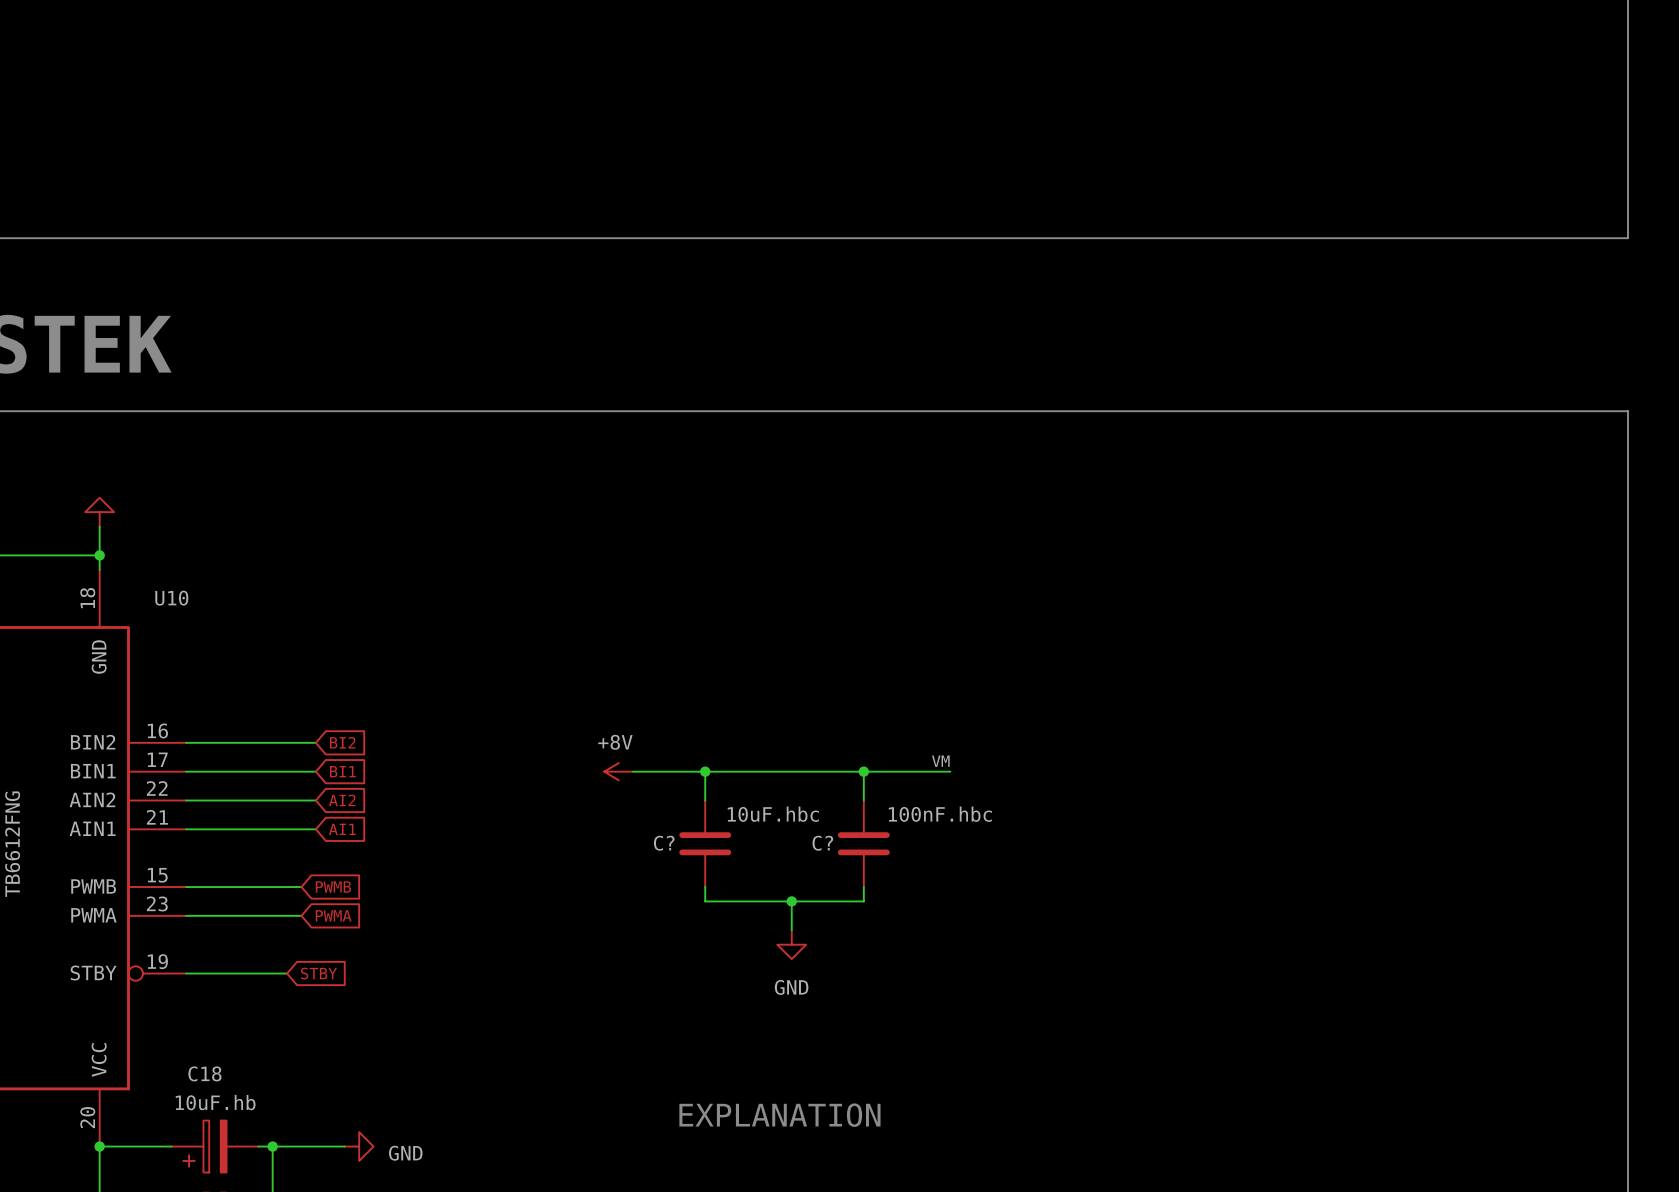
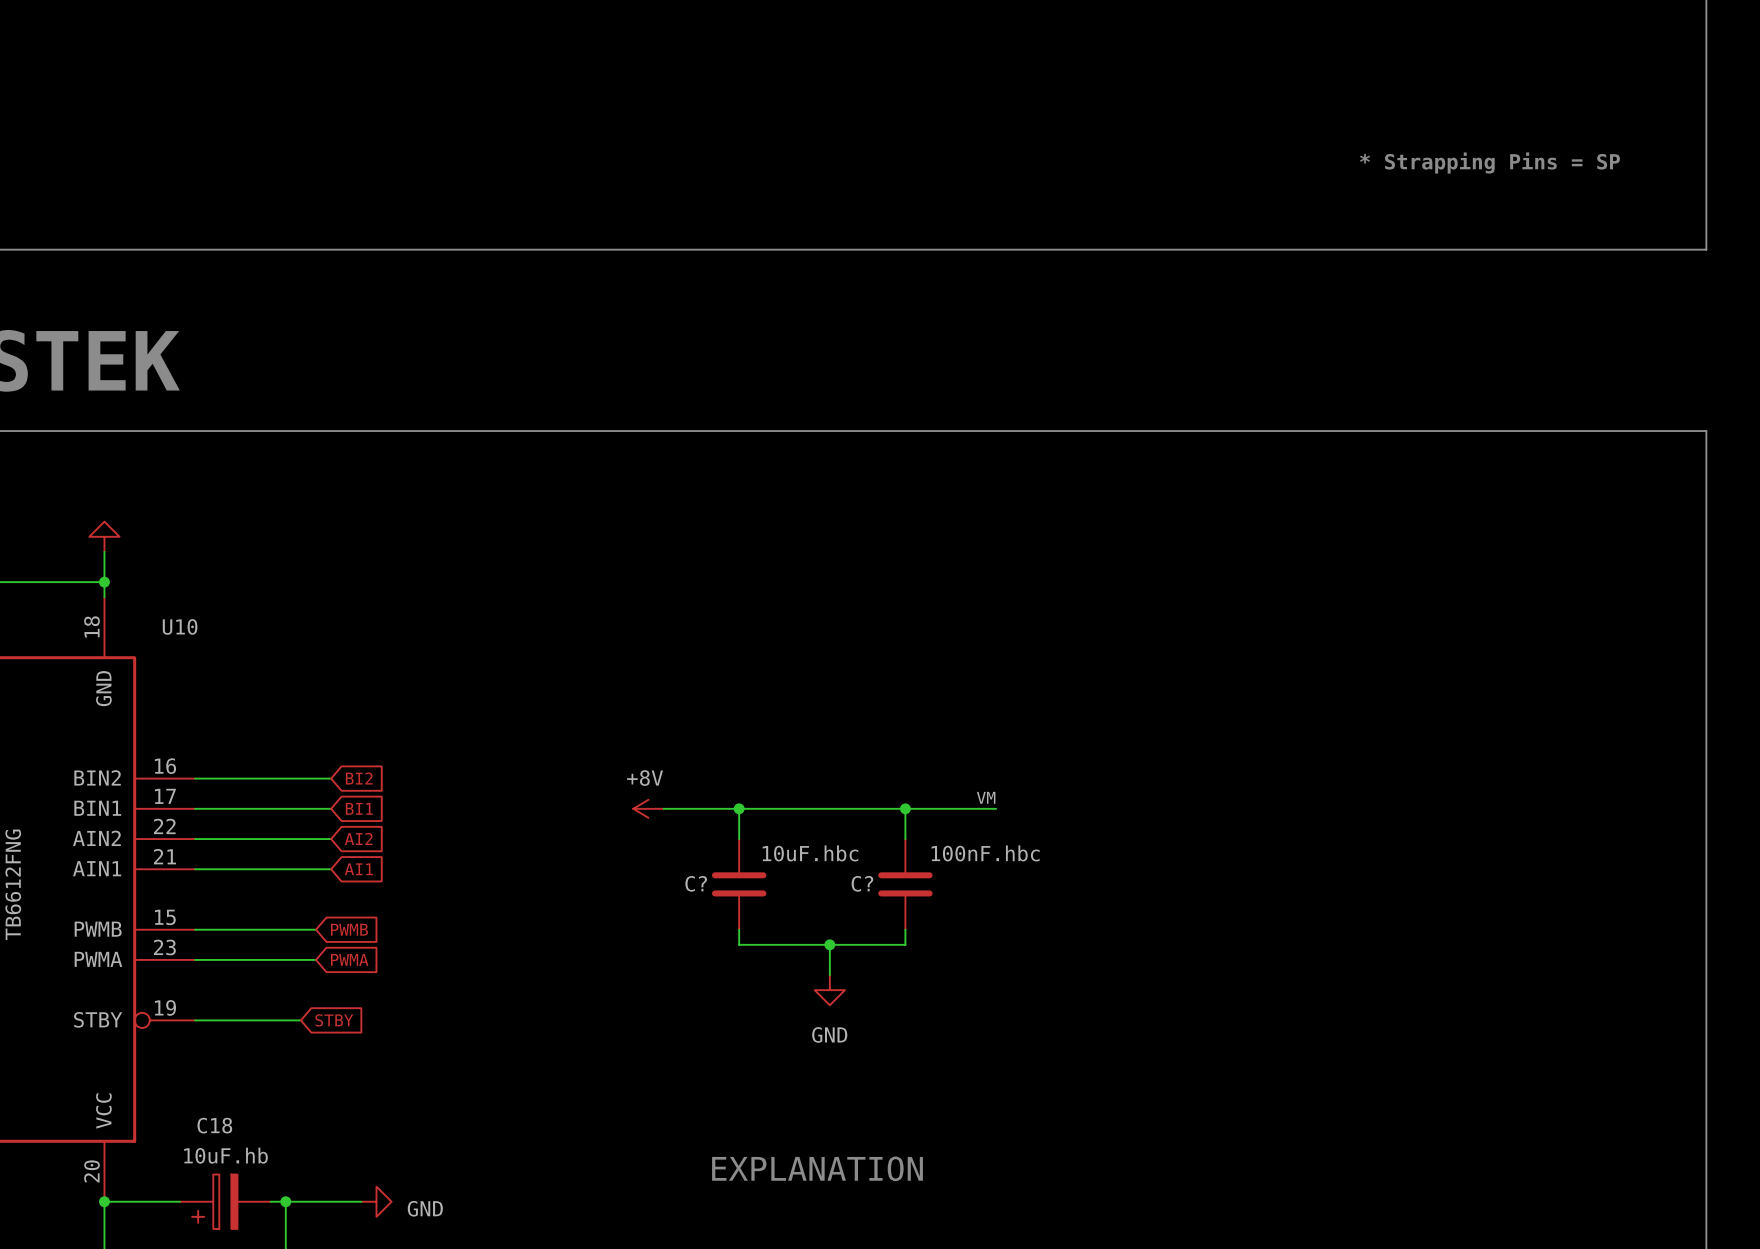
text: none -> * Strapping Pins = SP (1489, 163)

